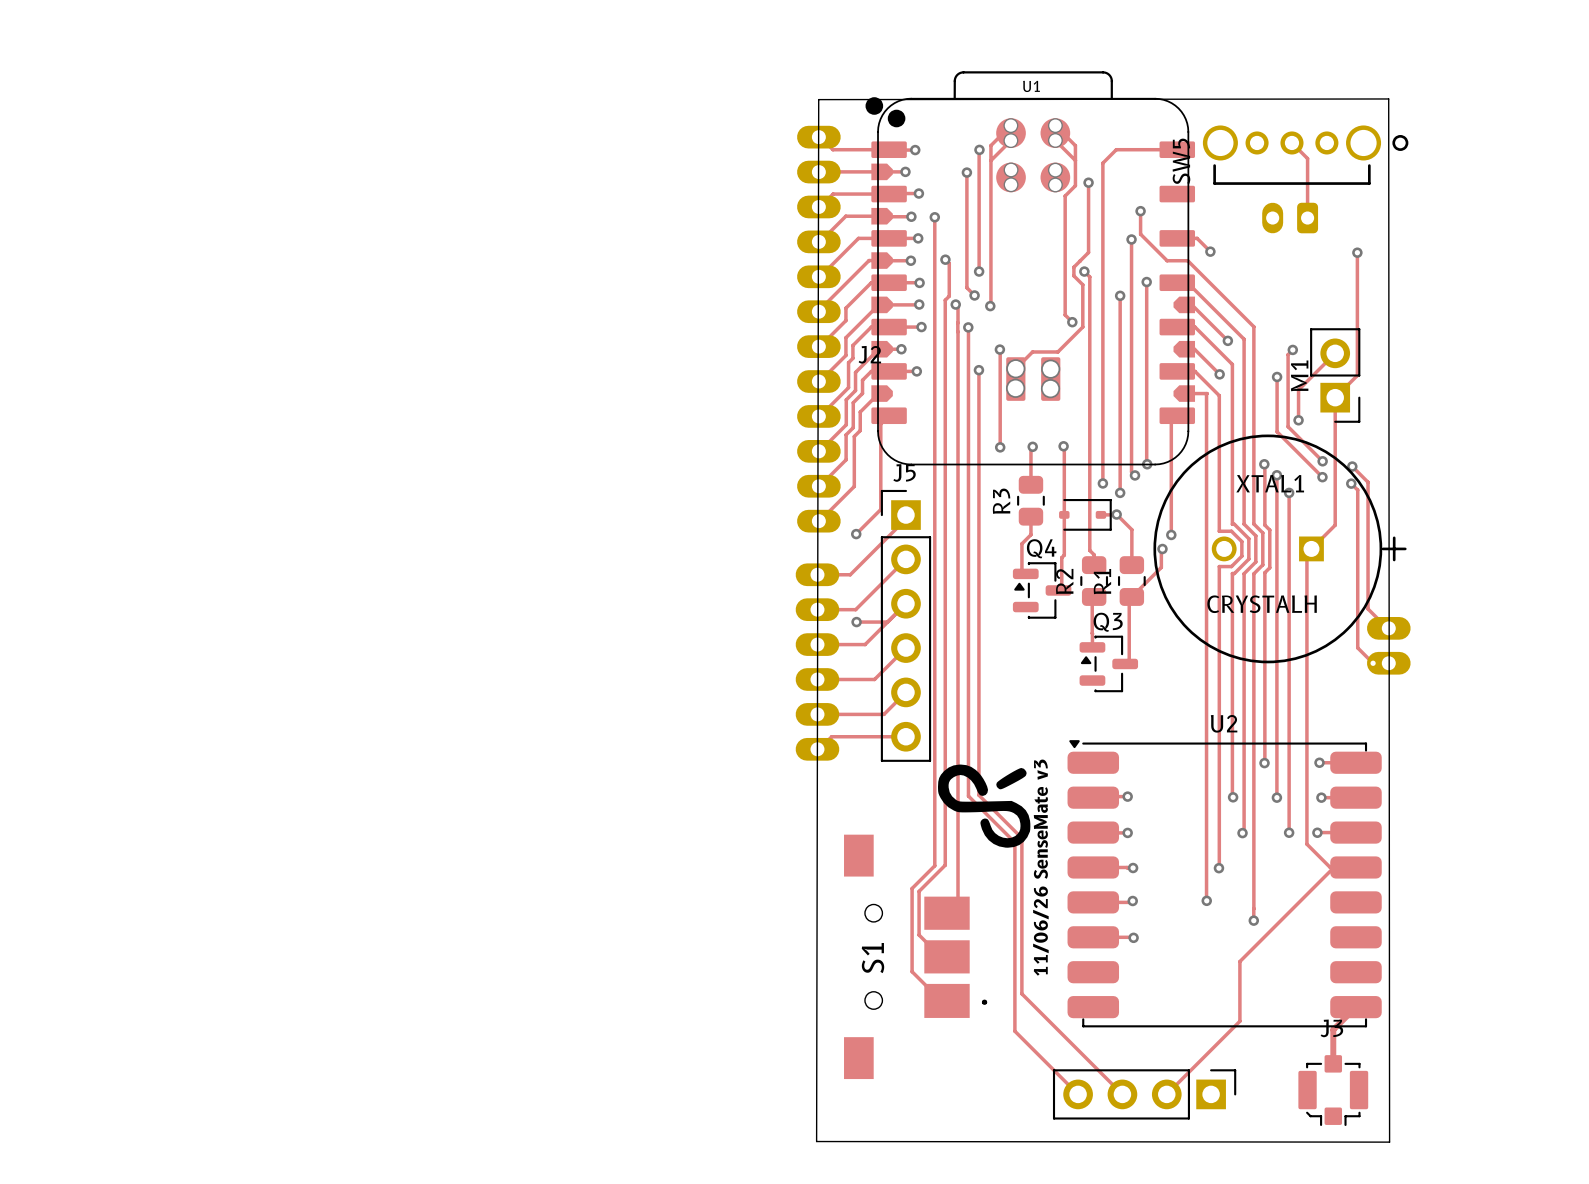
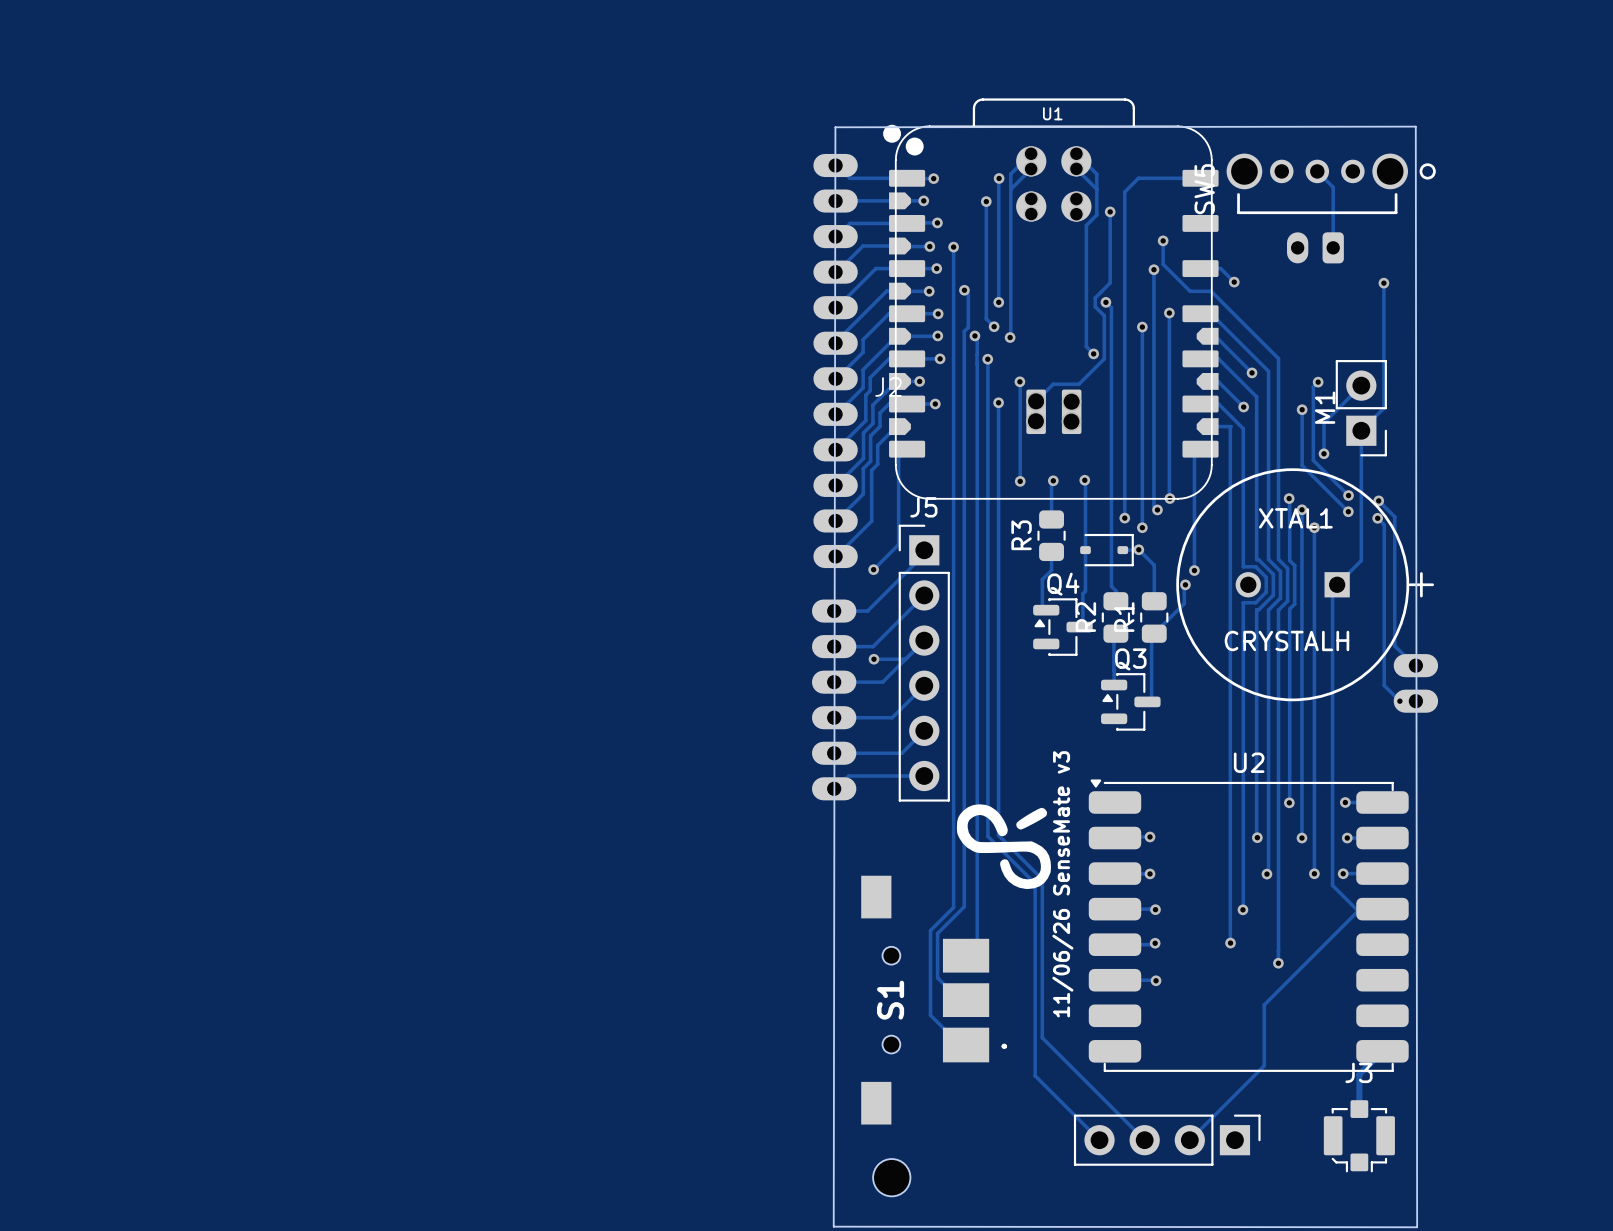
board edge: (1388, 98) (1389, 1142) (816, 1141) (818, 99) -> (1415, 126) (1417, 1227) (833, 1226) (835, 127)
part: none -> (891, 1177)

